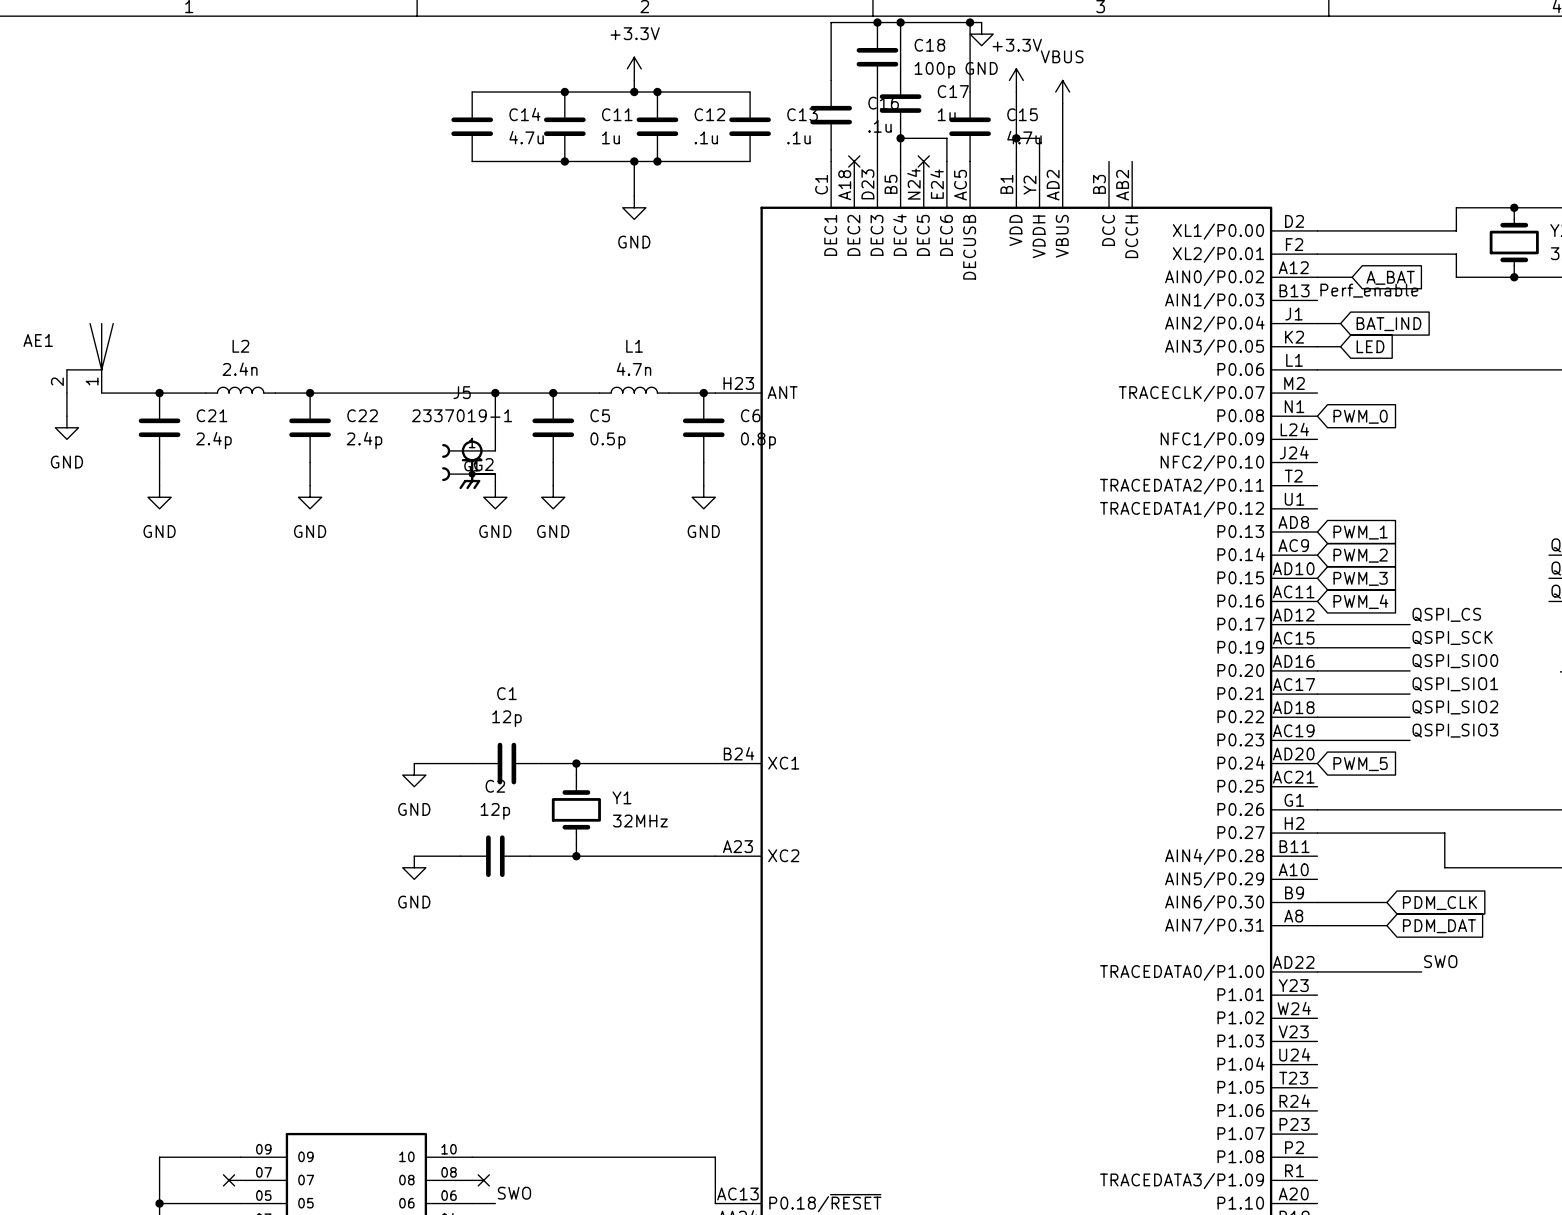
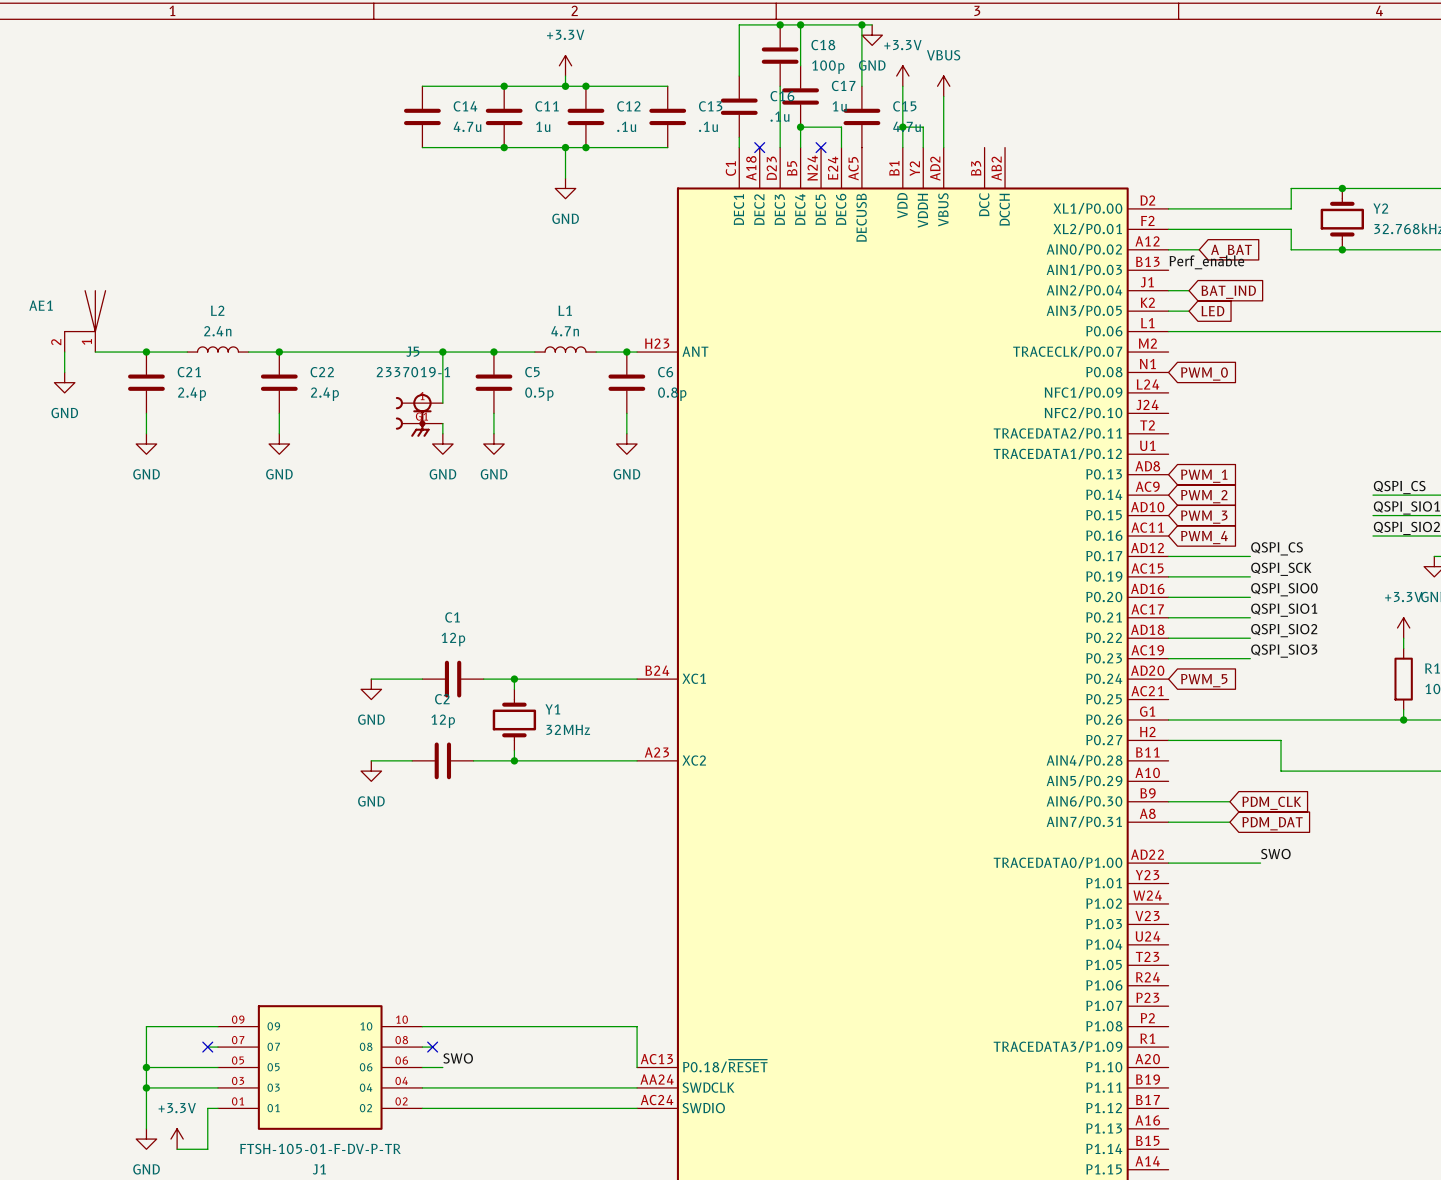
J5 symbol: [442, 440, 496, 490] -> [395, 393, 443, 437]

